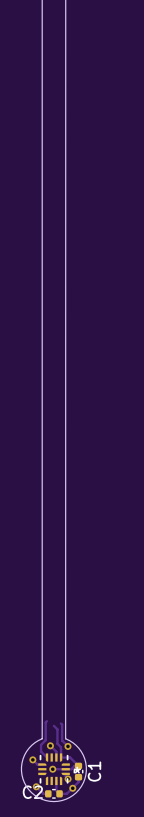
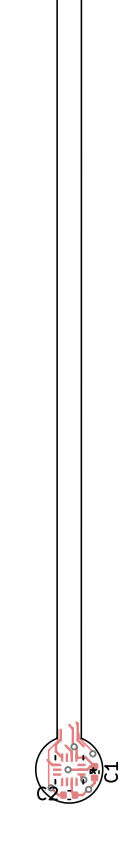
track: (46, 721) (45, 730) -> none
track: none -> (57, 729) (57, 741) (48, 750) (48, 785) (51, 787)
track: none -> (78, 733) (78, 737) (92, 753)
via: (50, 745) -> none
via: none -> (74, 746)
via: (67, 746) -> none
via: none -> (92, 753)
via: (32, 759) -> none

